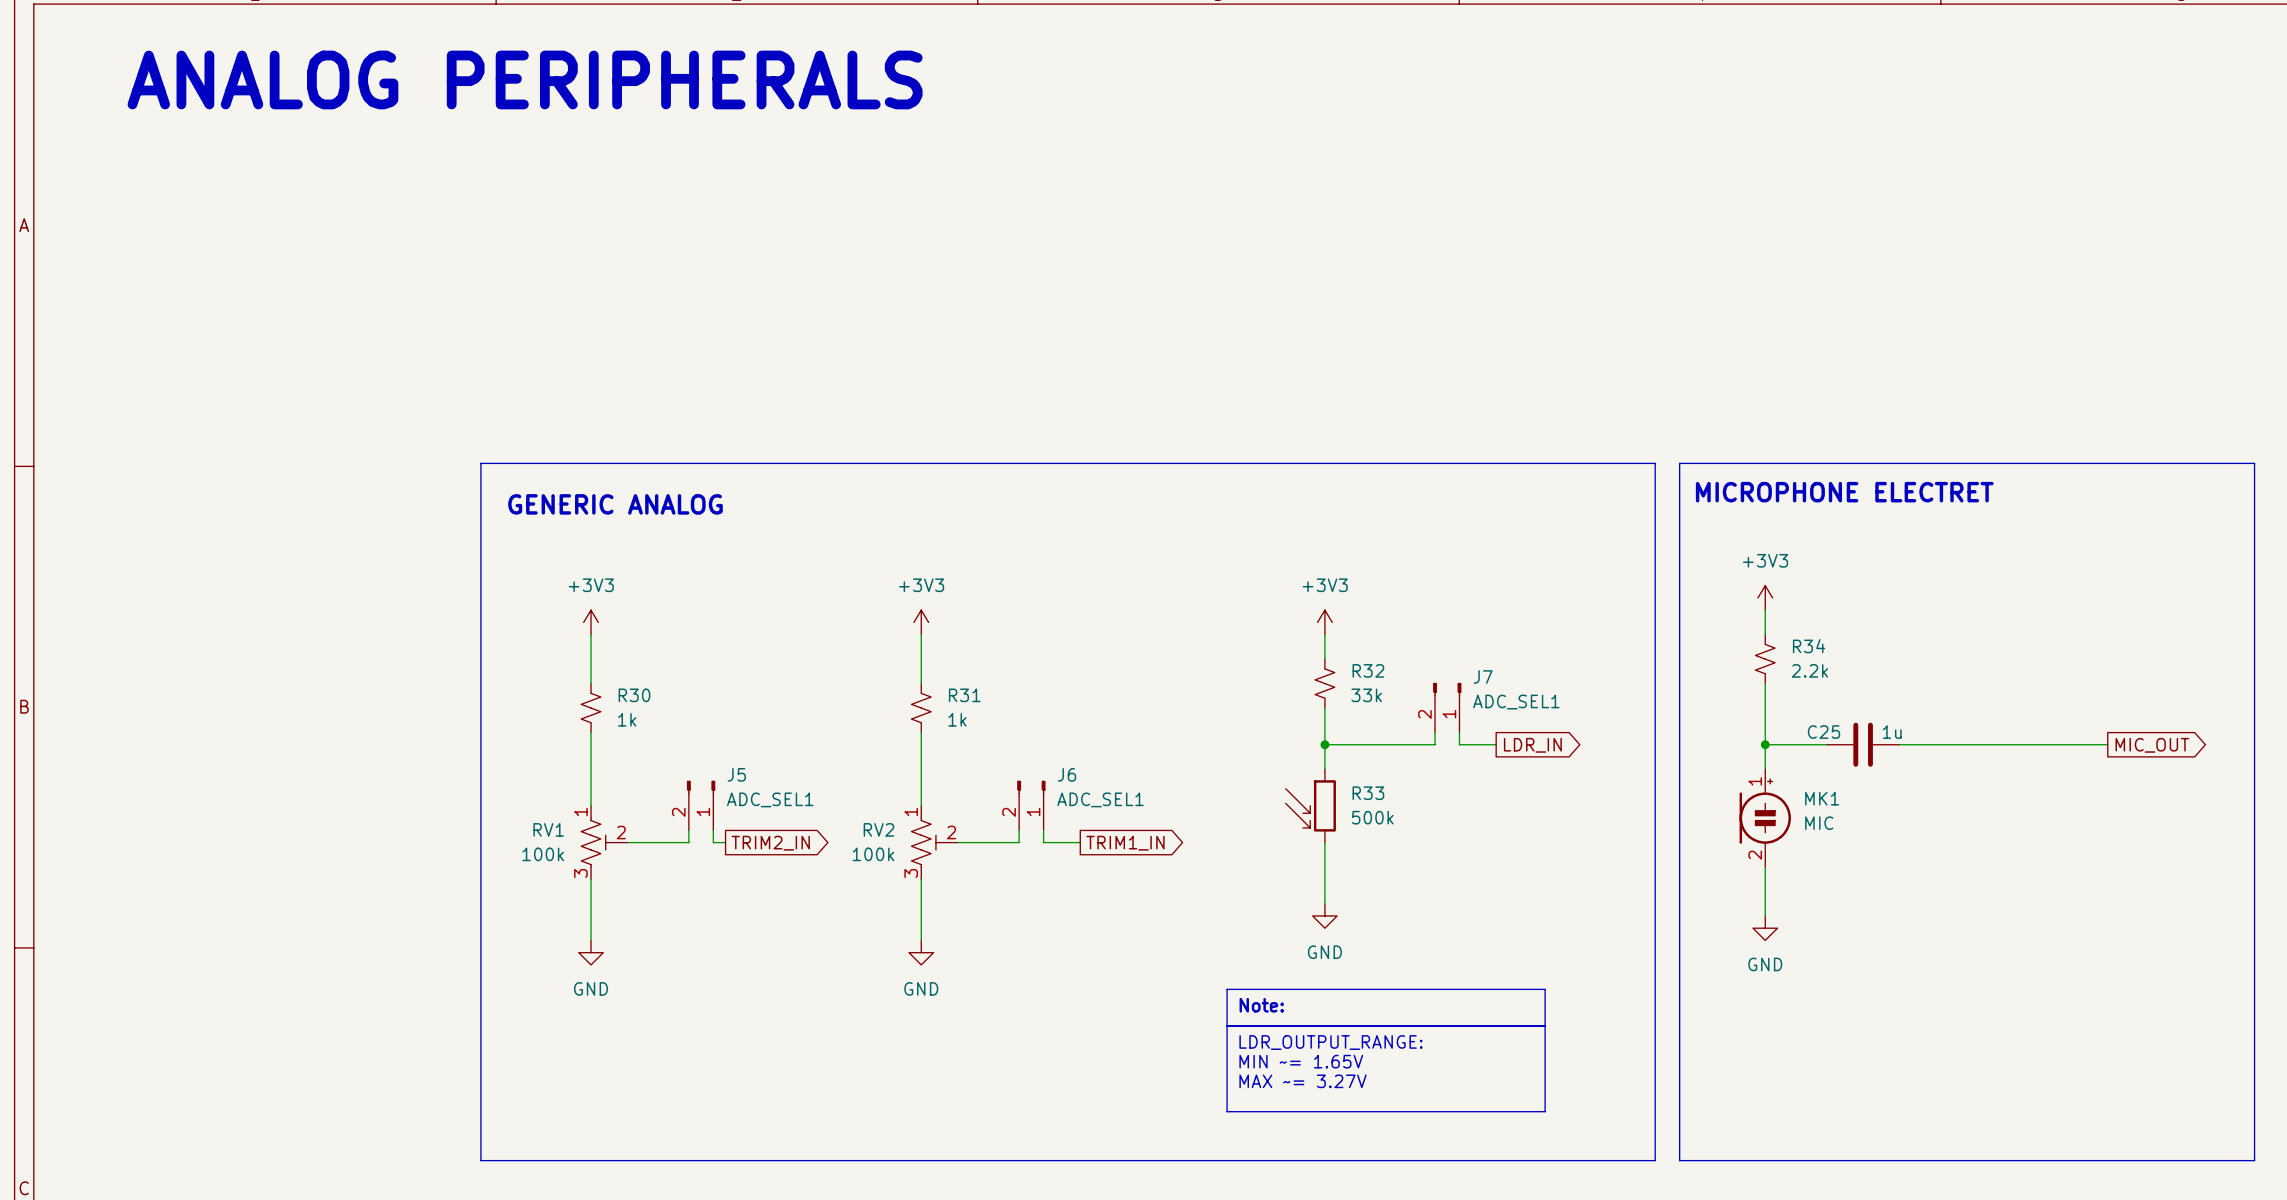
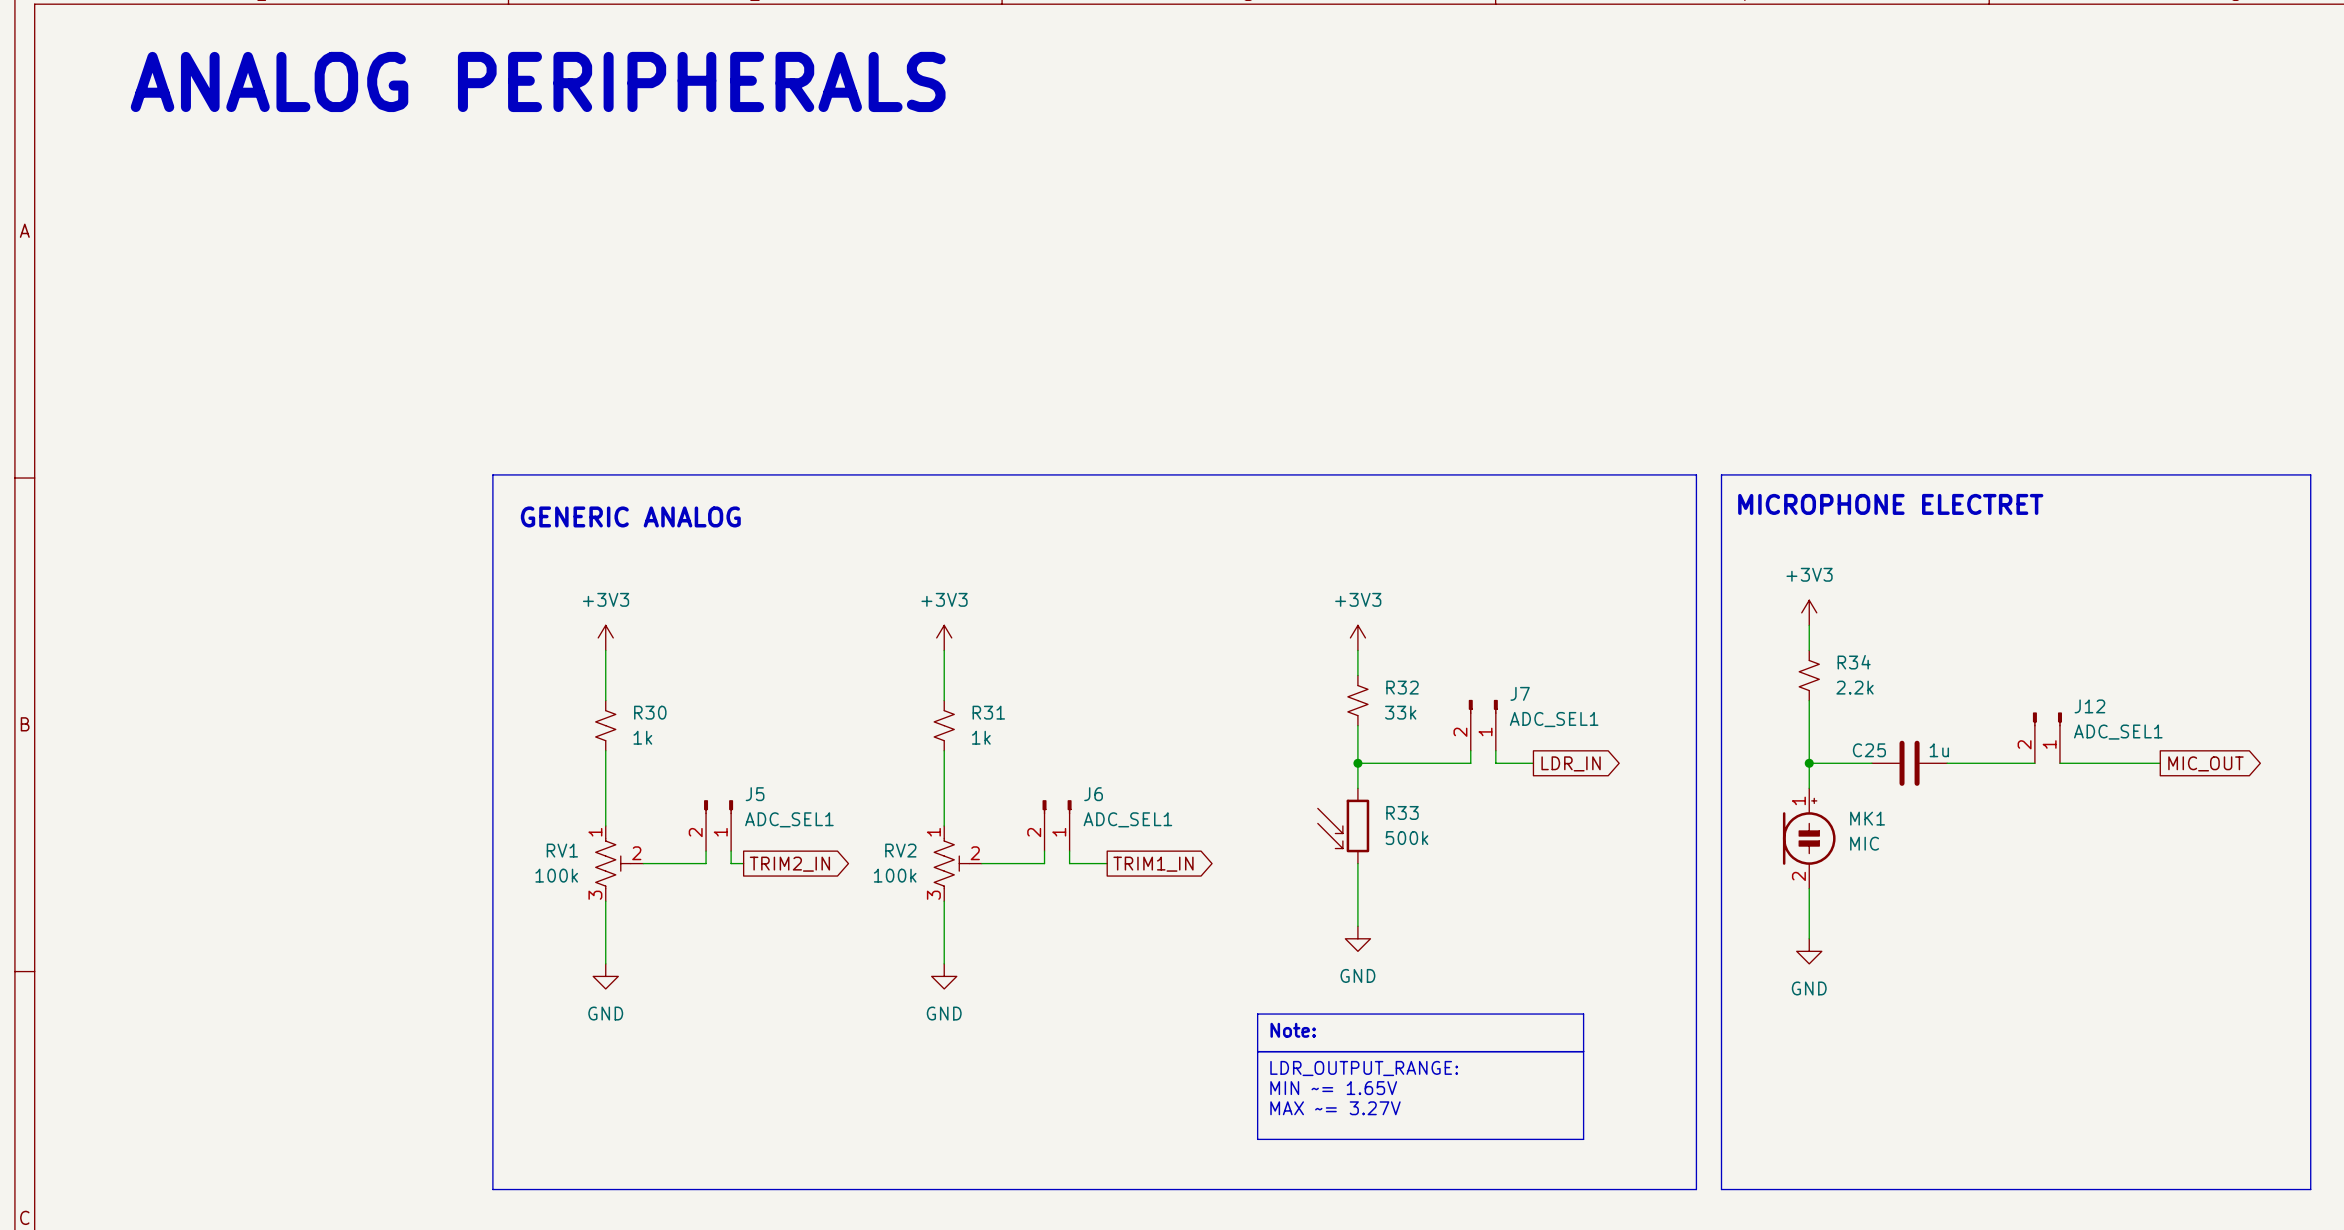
J12: none -> ADC_SEL1 (2047, 737)
wire: (1985, 744) (2009, 744) -> none

